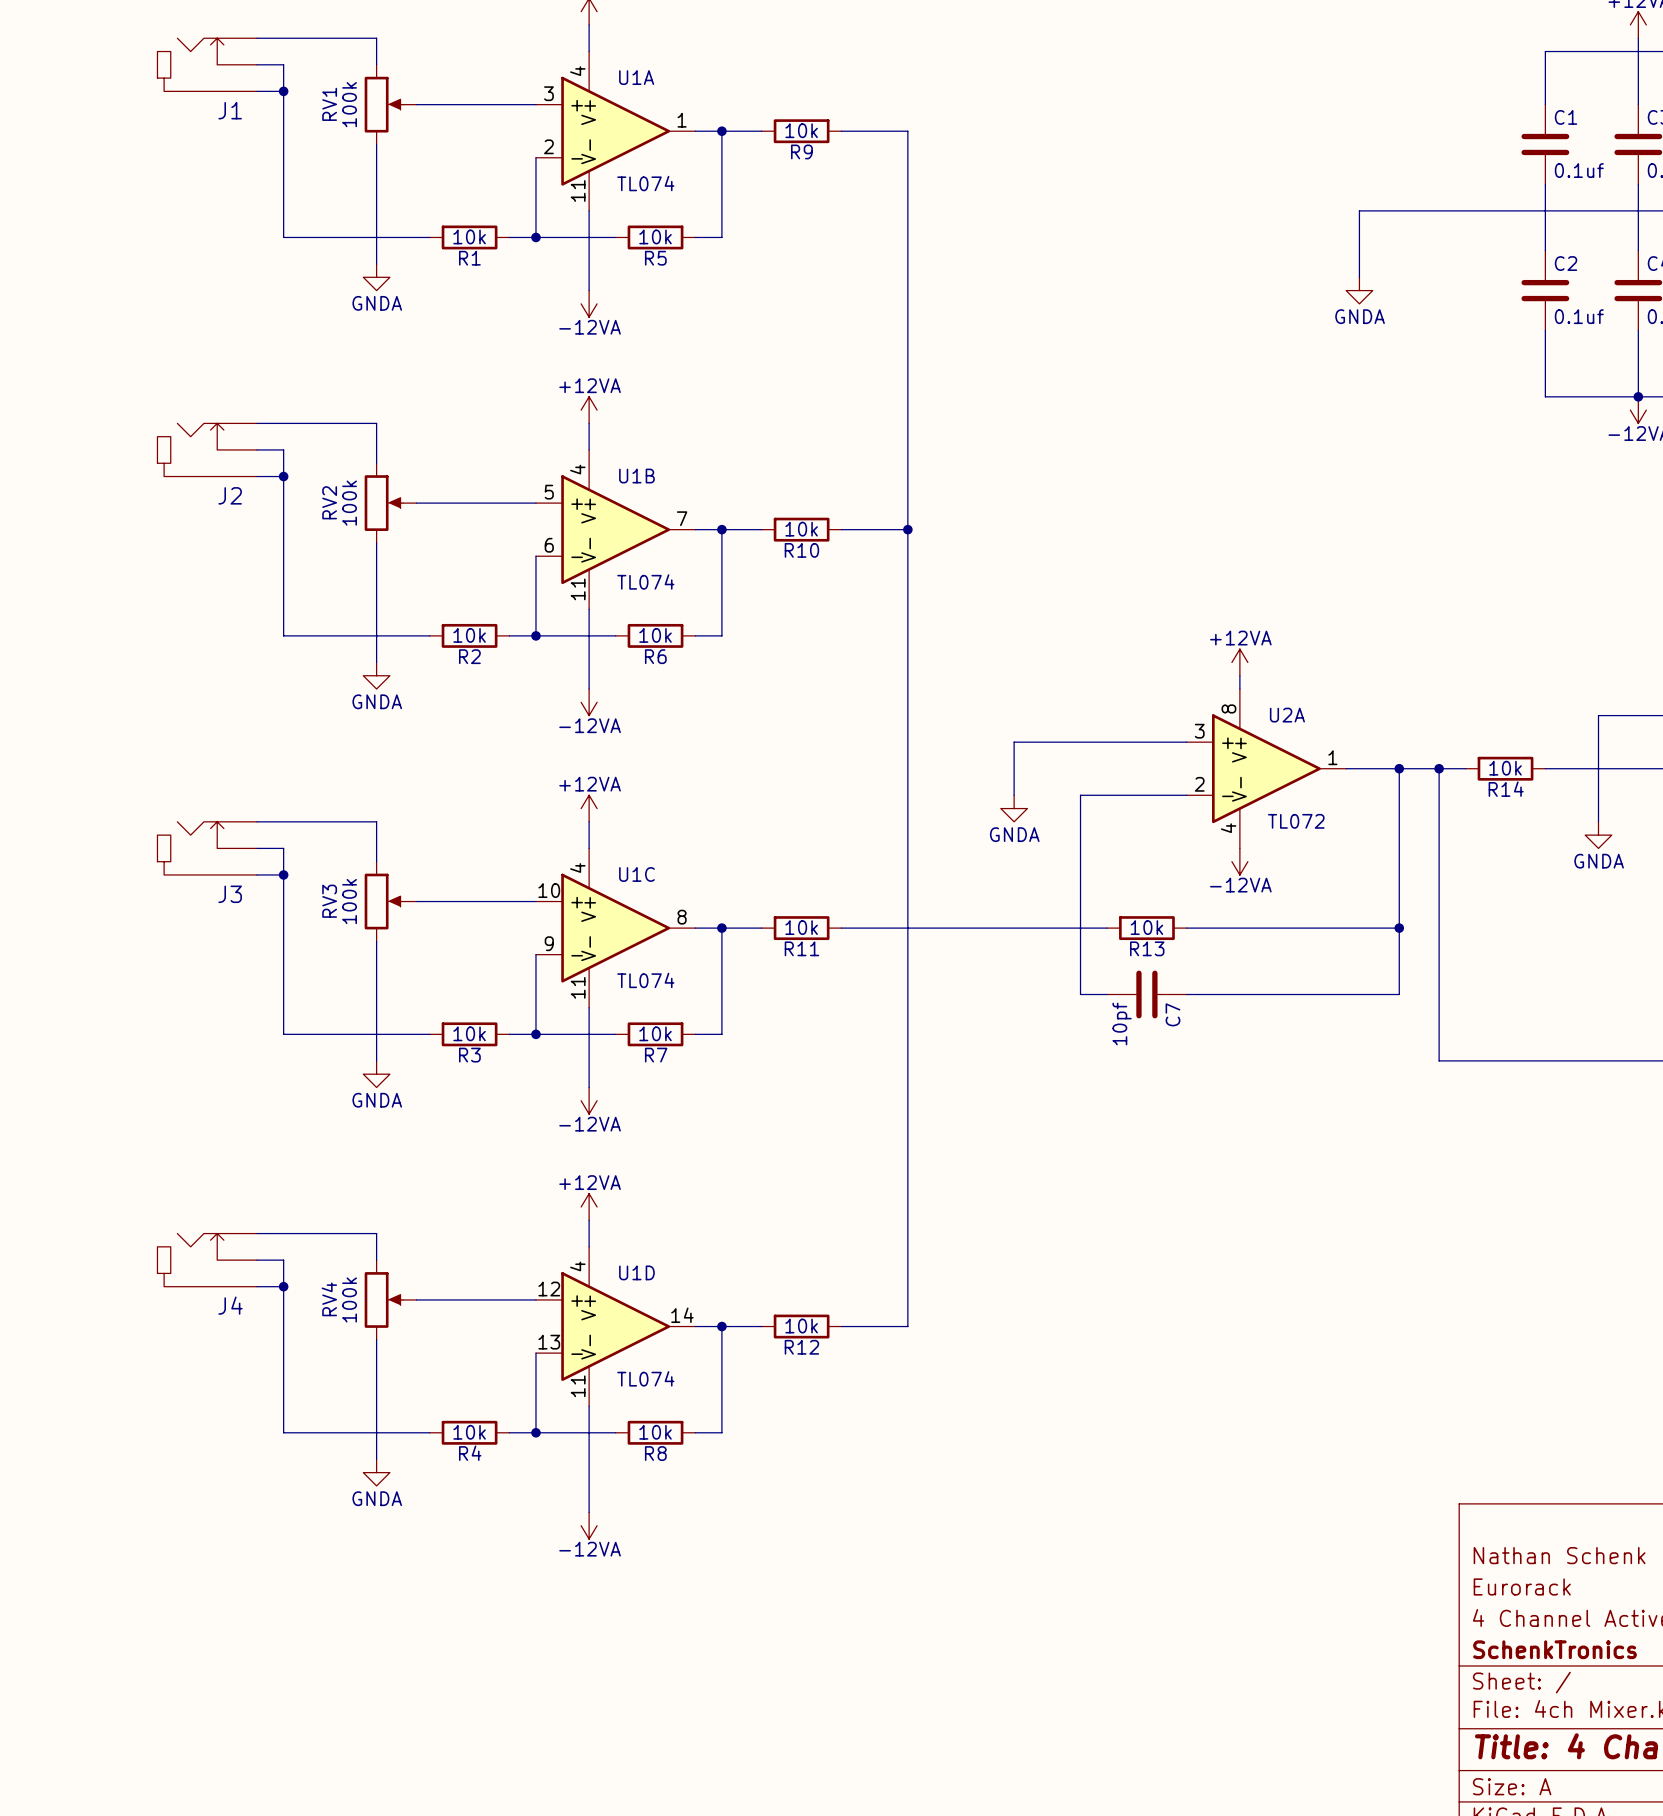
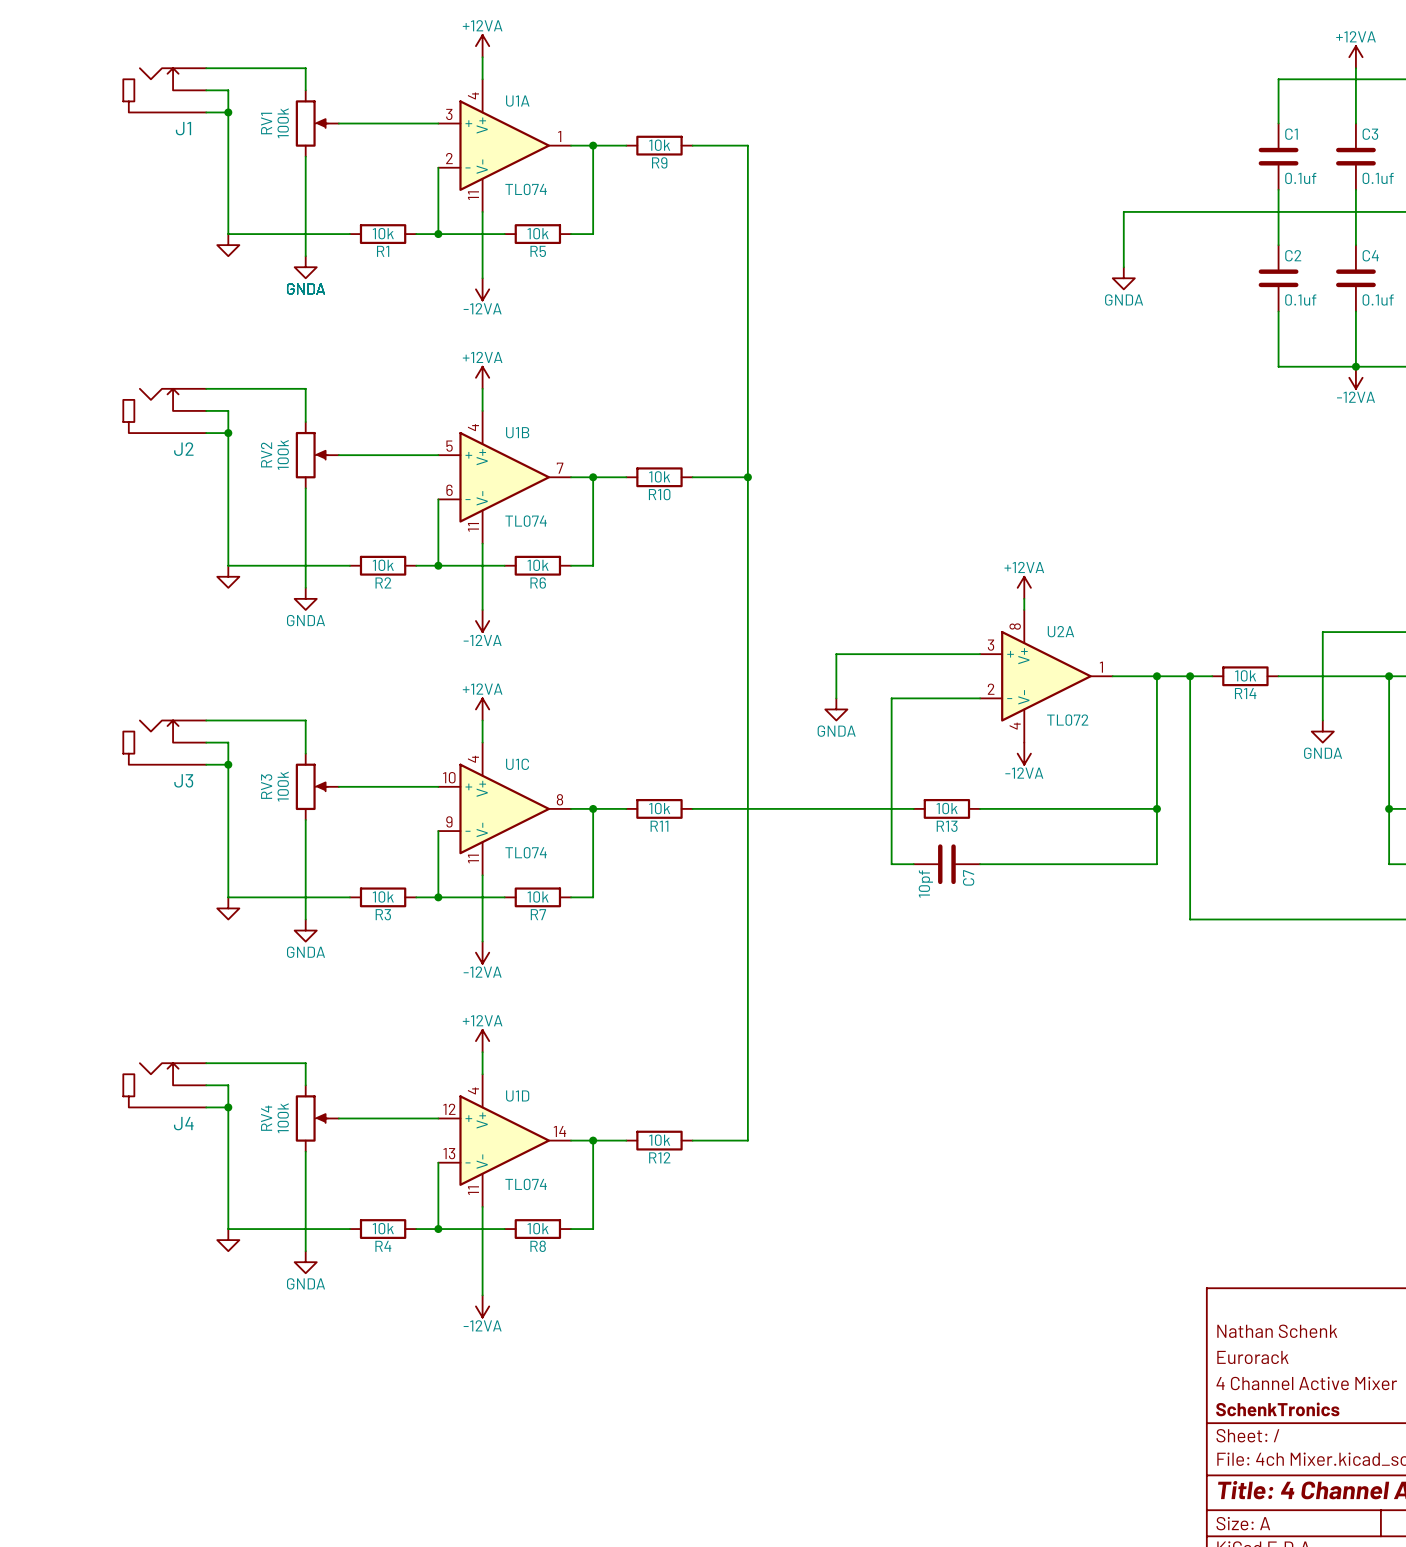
power symbol: none -> GNDA (228, 245)
power symbol: none -> GNDA (228, 576)
power symbol: none -> GNDA (228, 908)
power symbol: none -> GNDA (228, 1240)

